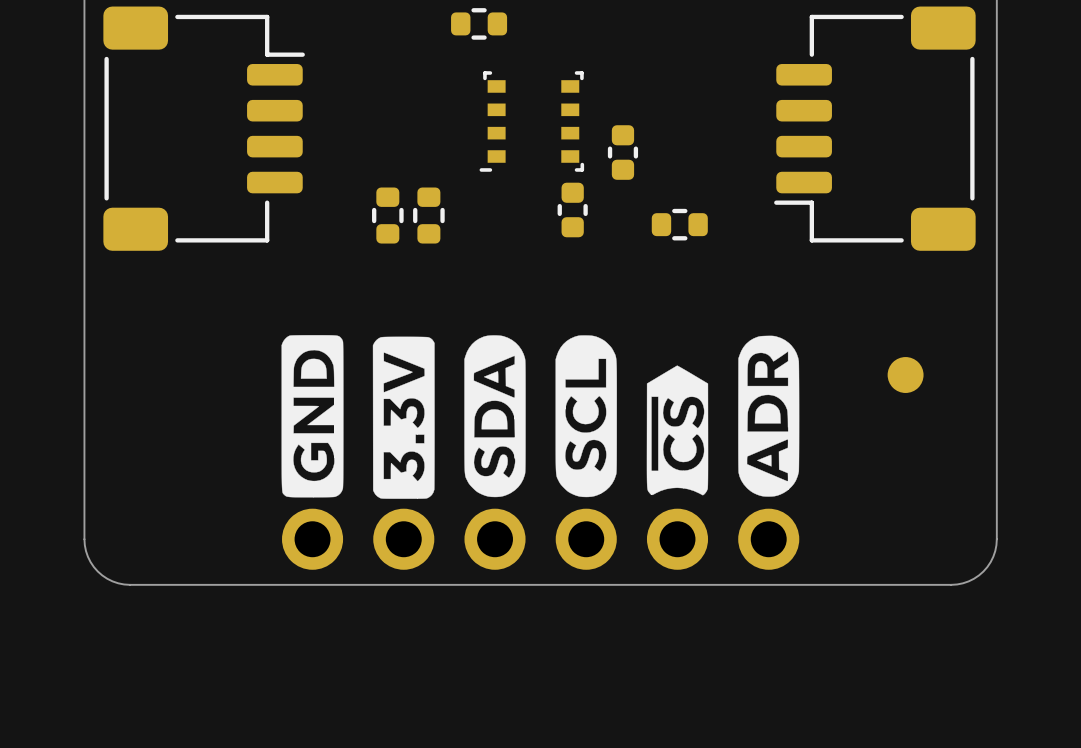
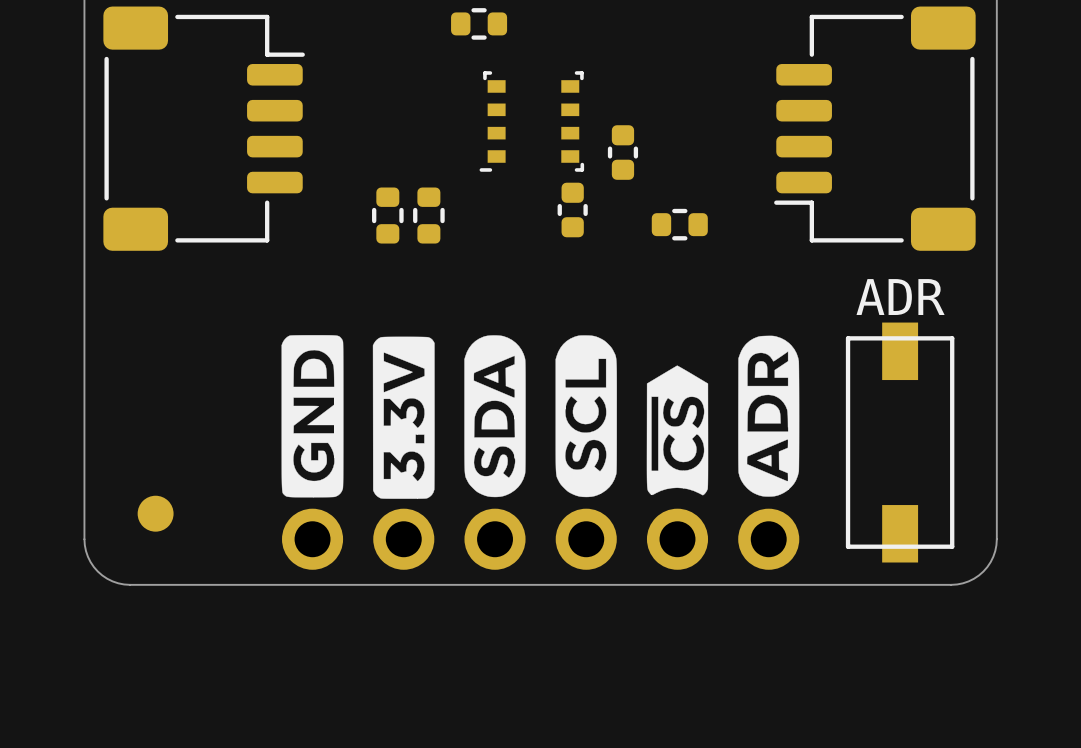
text: none -> ADR (900, 297)
part position: (905, 375) -> (155, 513)
part: none -> (900, 442)

